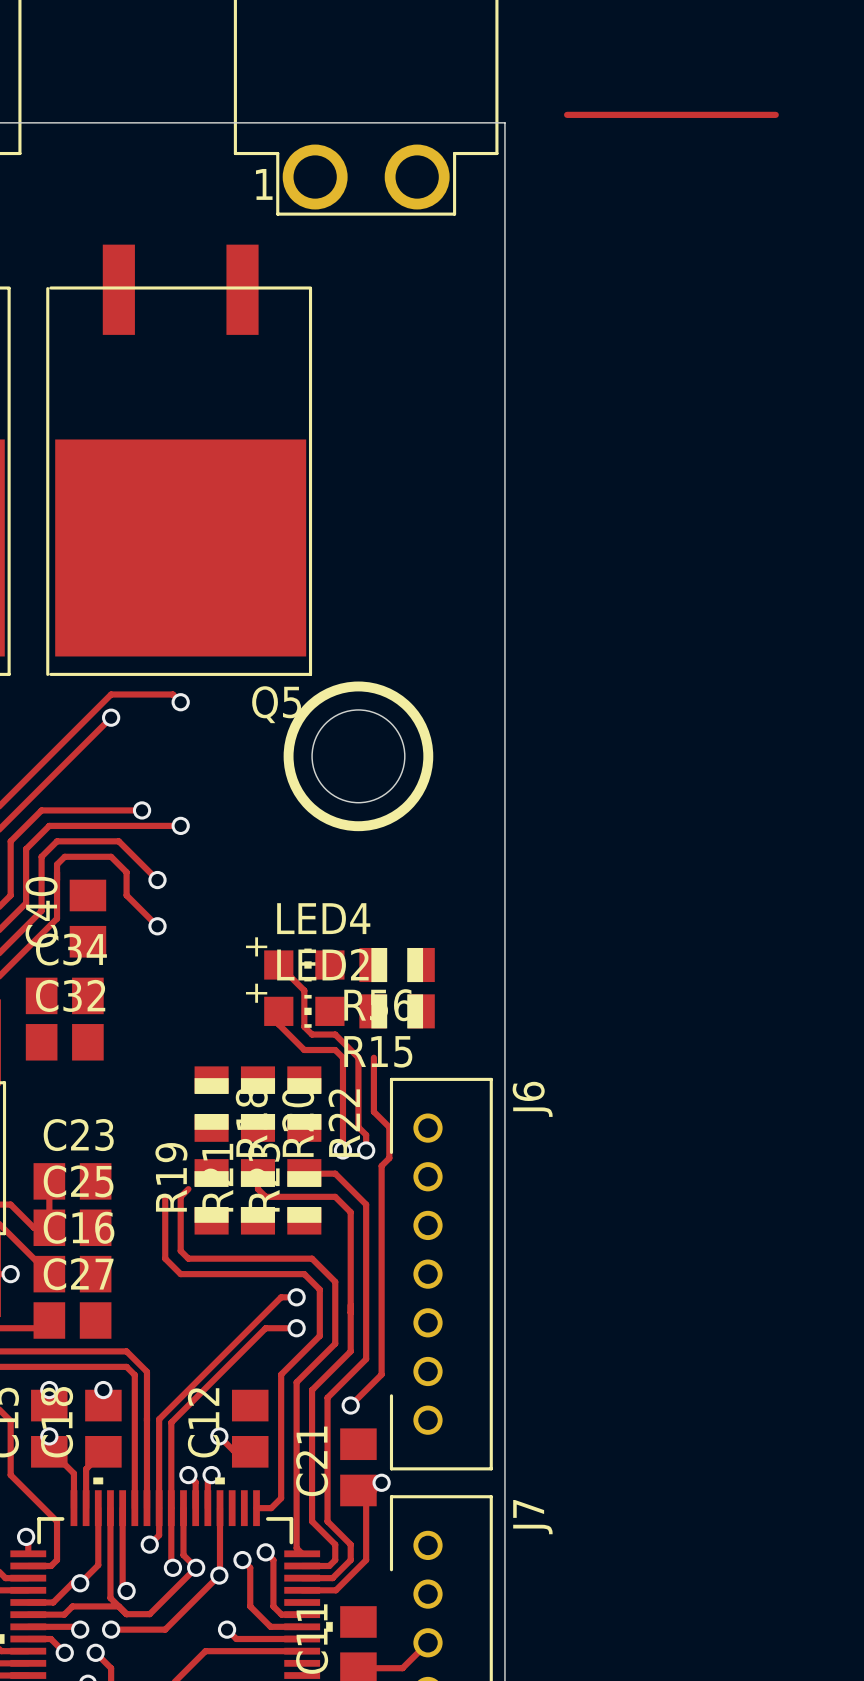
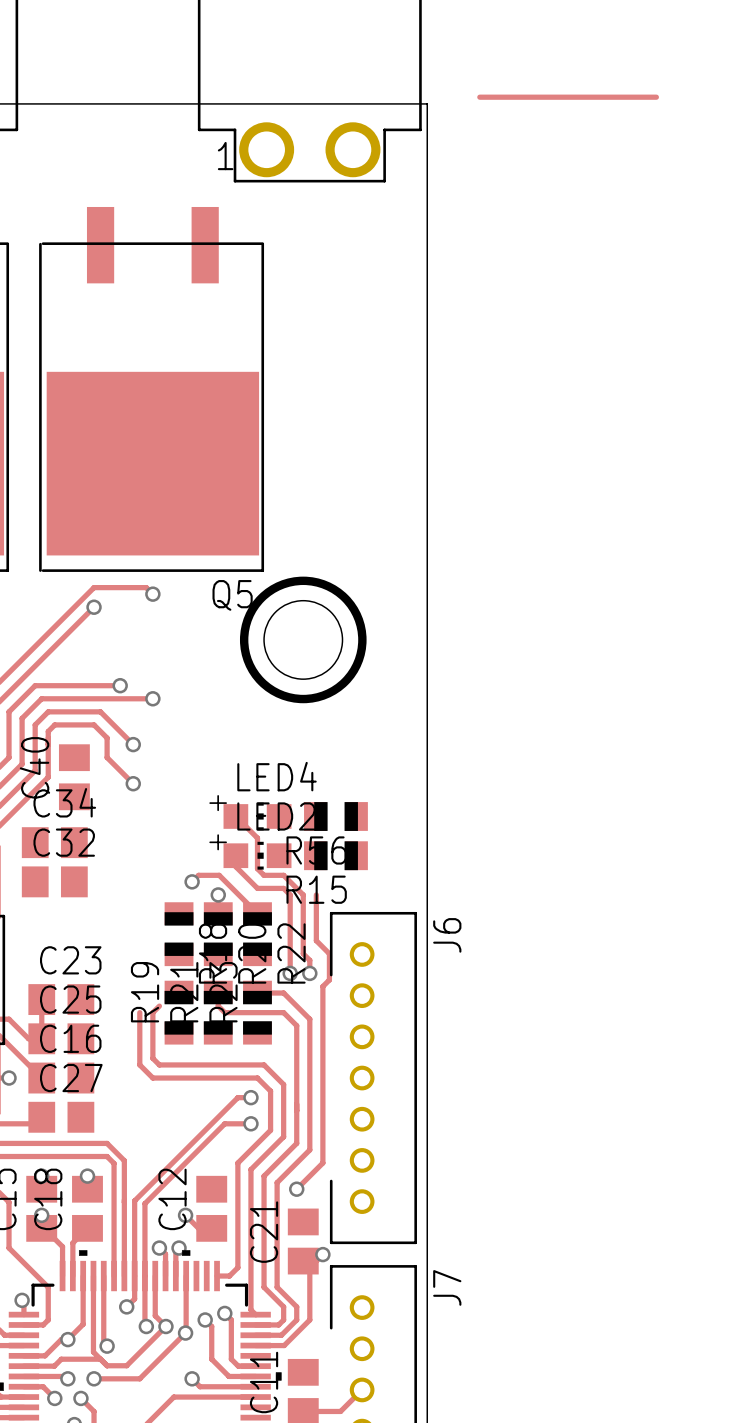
track: none -> (192, 881) (198, 875) (219, 875) (257, 913)
via: none -> (192, 881)
via: none -> (218, 894)

